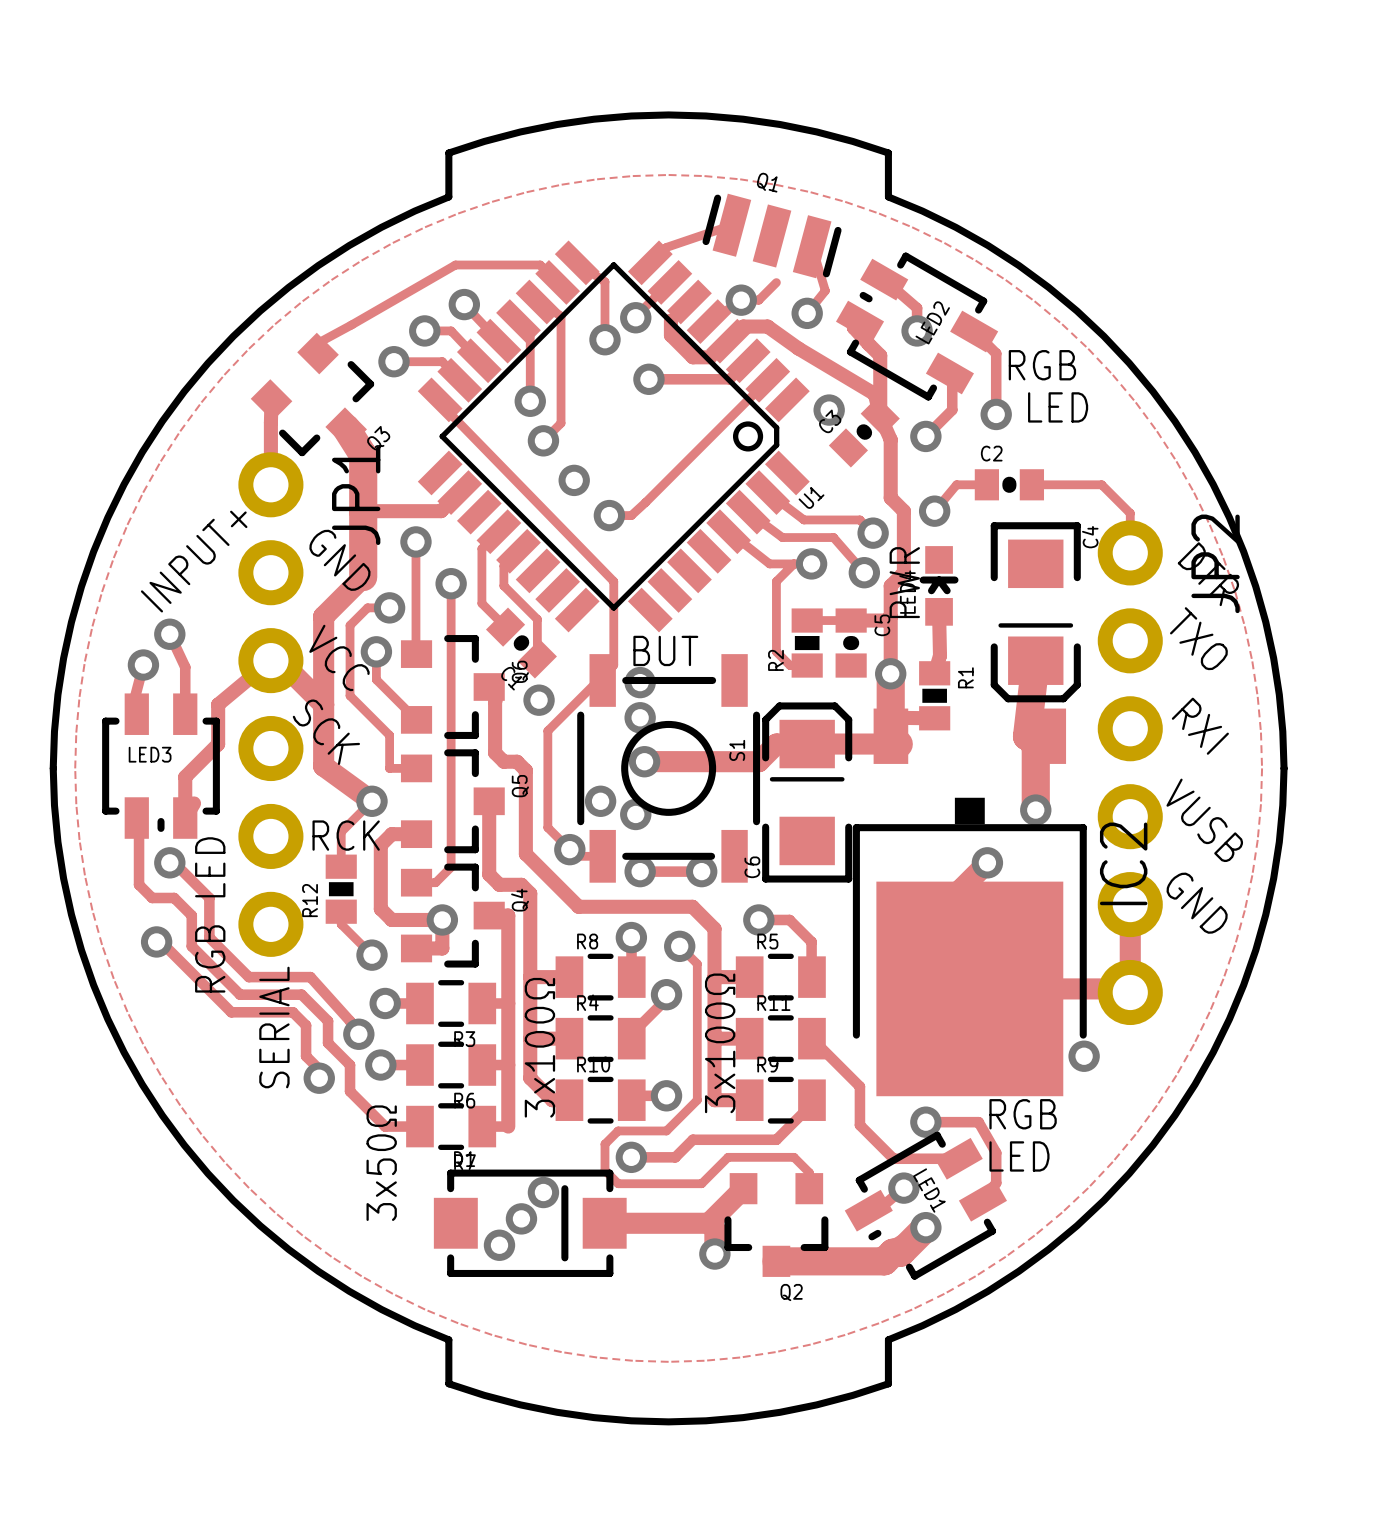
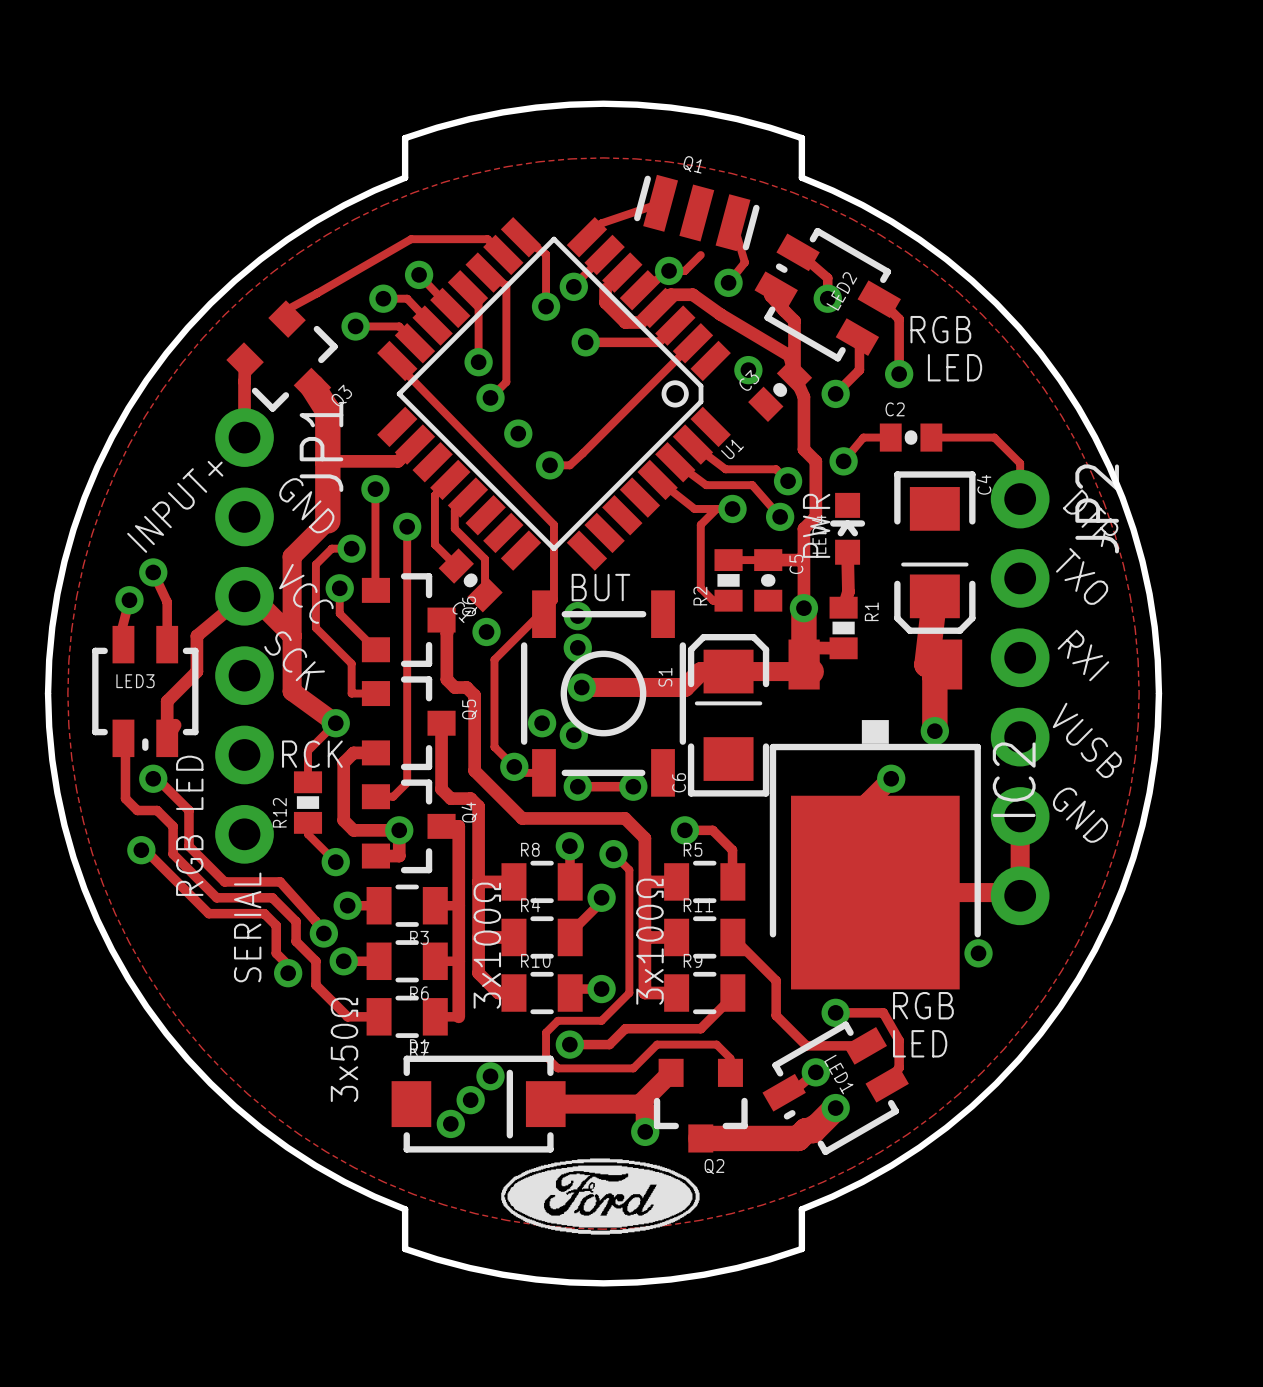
drawing: none -> [501, 1158, 700, 1235]

